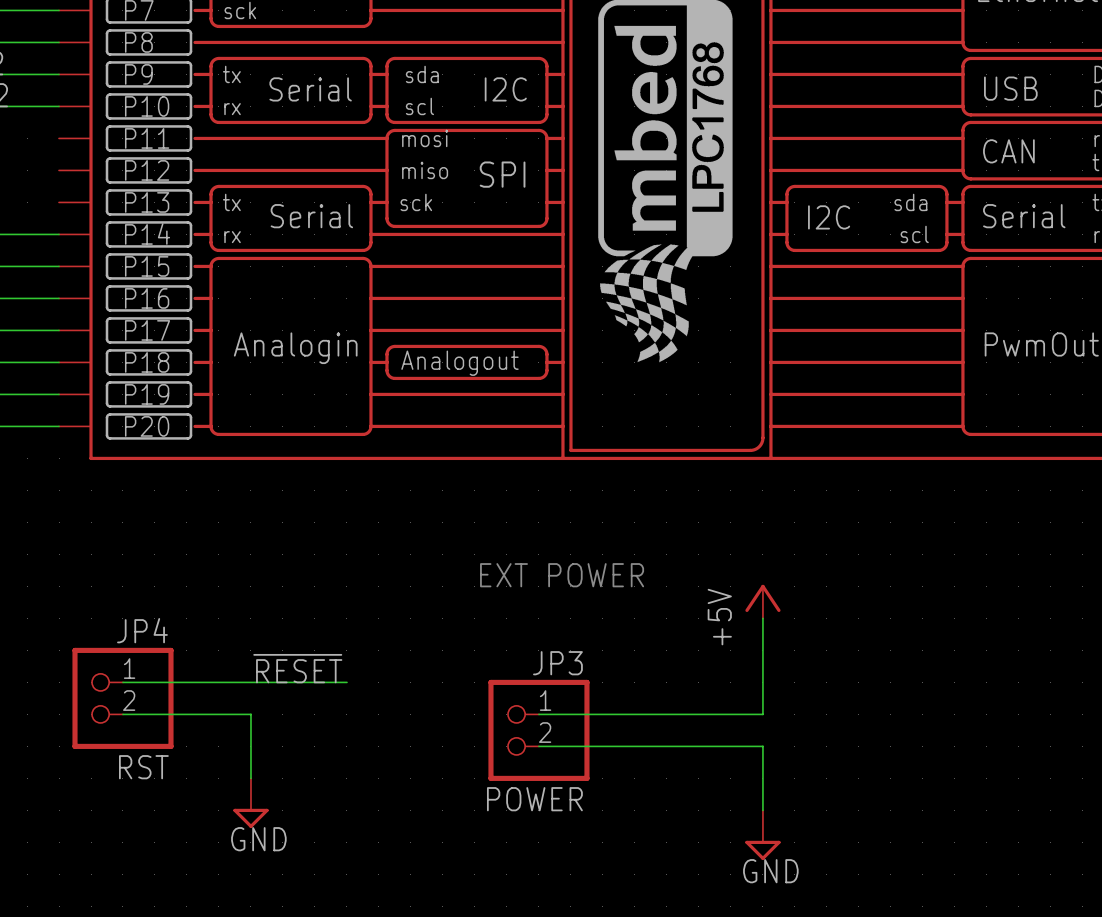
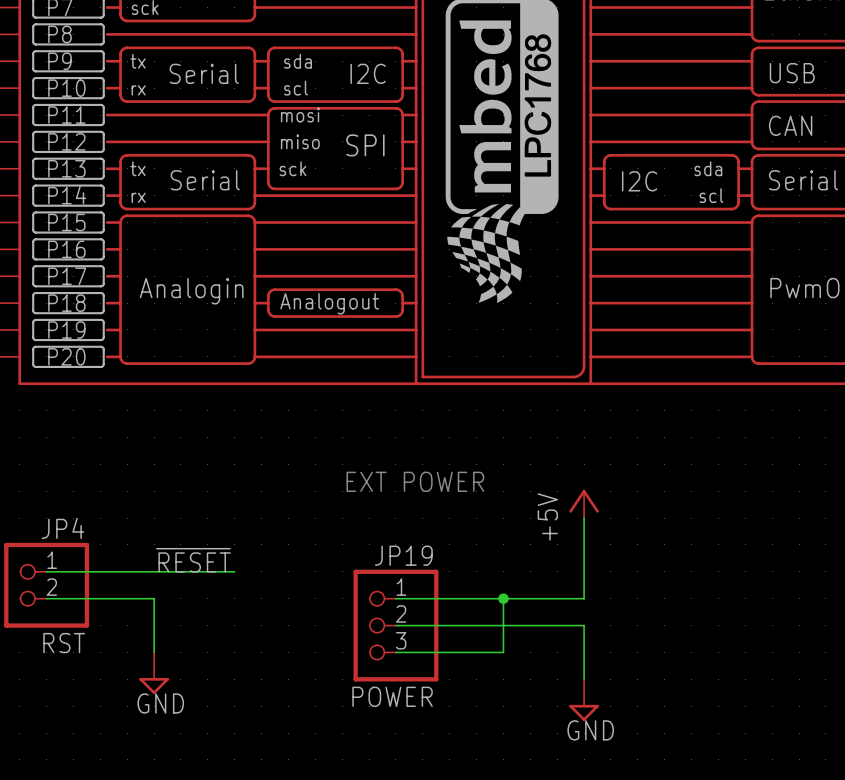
wire: none -> (503, 598) (503, 652) (395, 652)
junction: none -> (503, 598)
JP3: POWER (538, 730) -> none
JP19: none -> POWER (395, 625)

